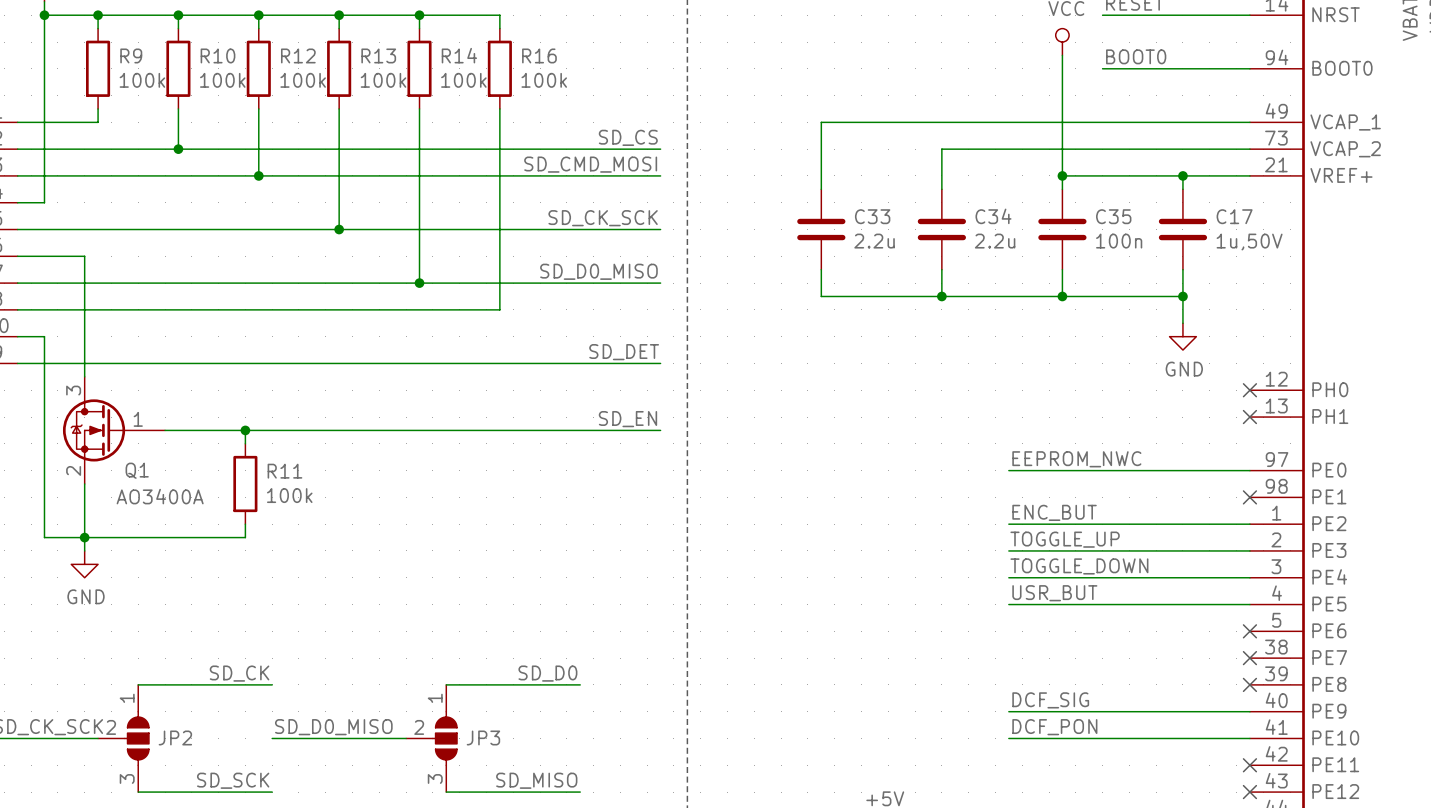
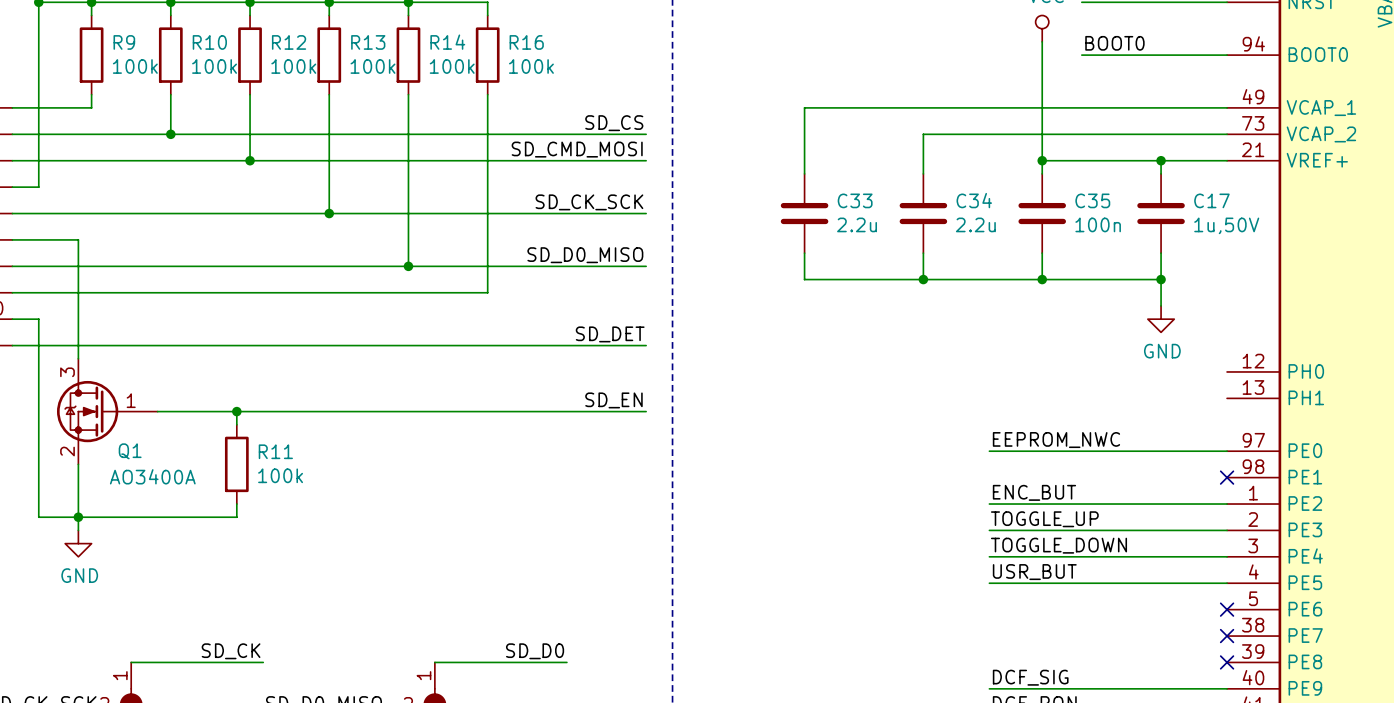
no-connect mark: (1249, 390) -> none
no-connect mark: (1249, 417) -> none

